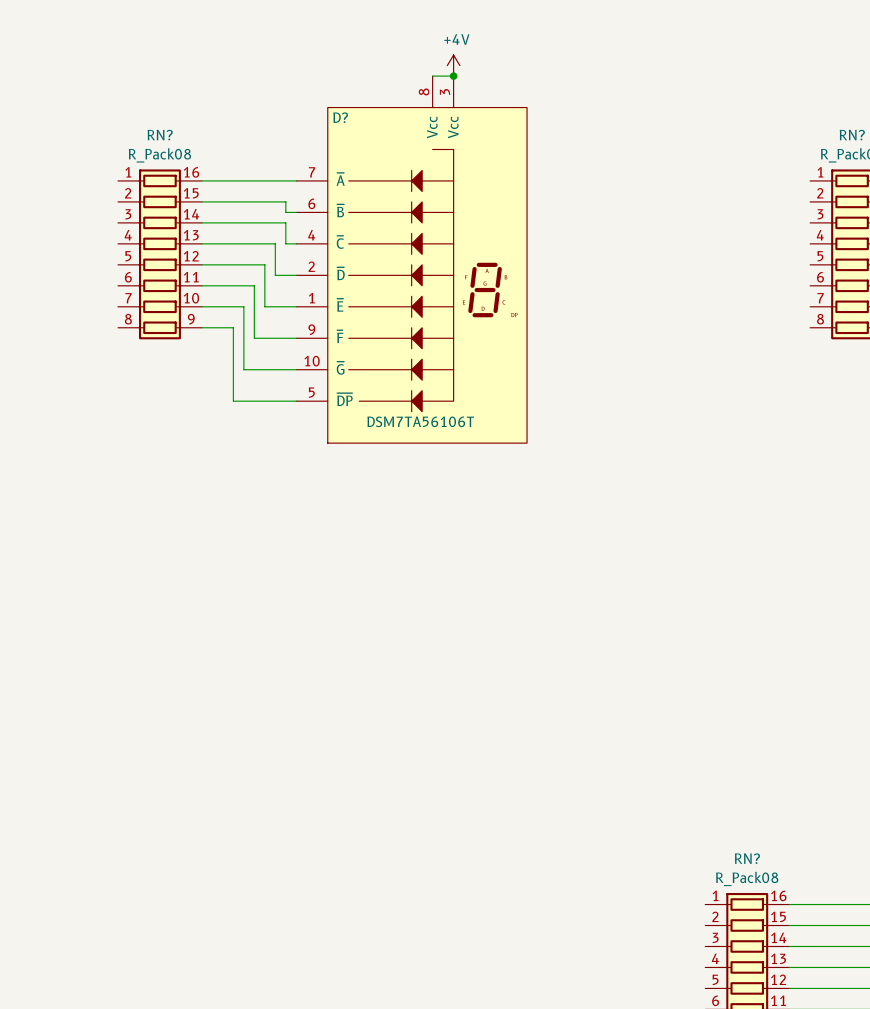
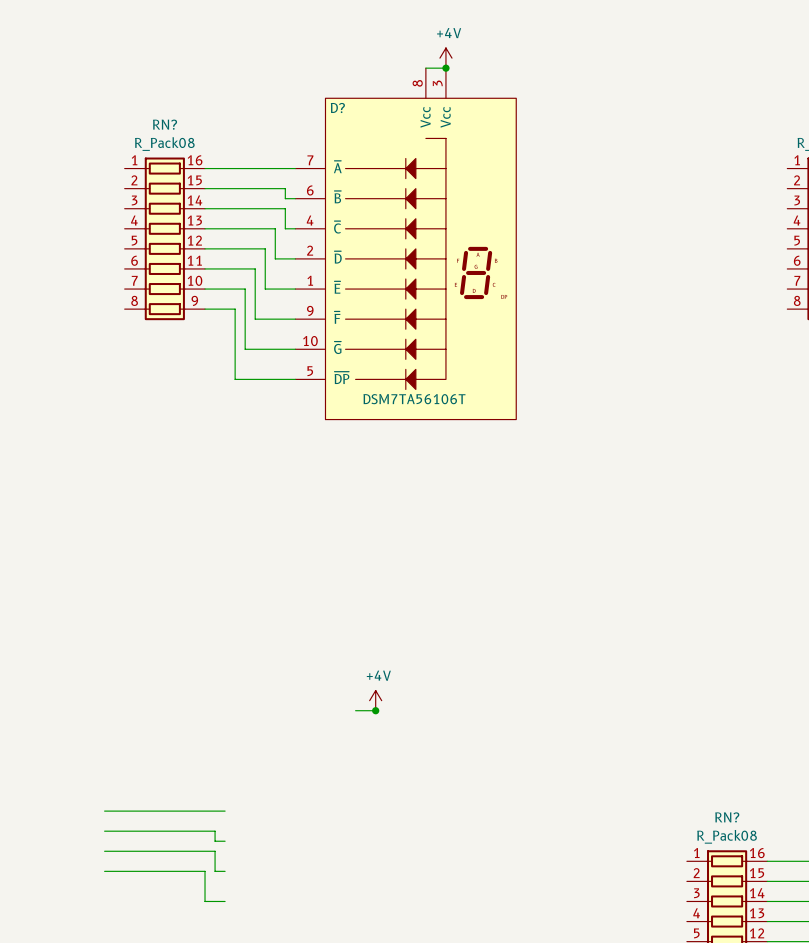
power symbol: none -> +4V (375, 700)
wire: none -> (355, 710) (375, 710)
junction: none -> (375, 710)
wire: none -> (104, 811) (225, 811)
wire: none -> (104, 831) (215, 831) (215, 841) (225, 841)
wire: none -> (104, 851) (215, 851) (215, 871) (225, 871)
wire: none -> (104, 871) (205, 871) (205, 901) (225, 901)

